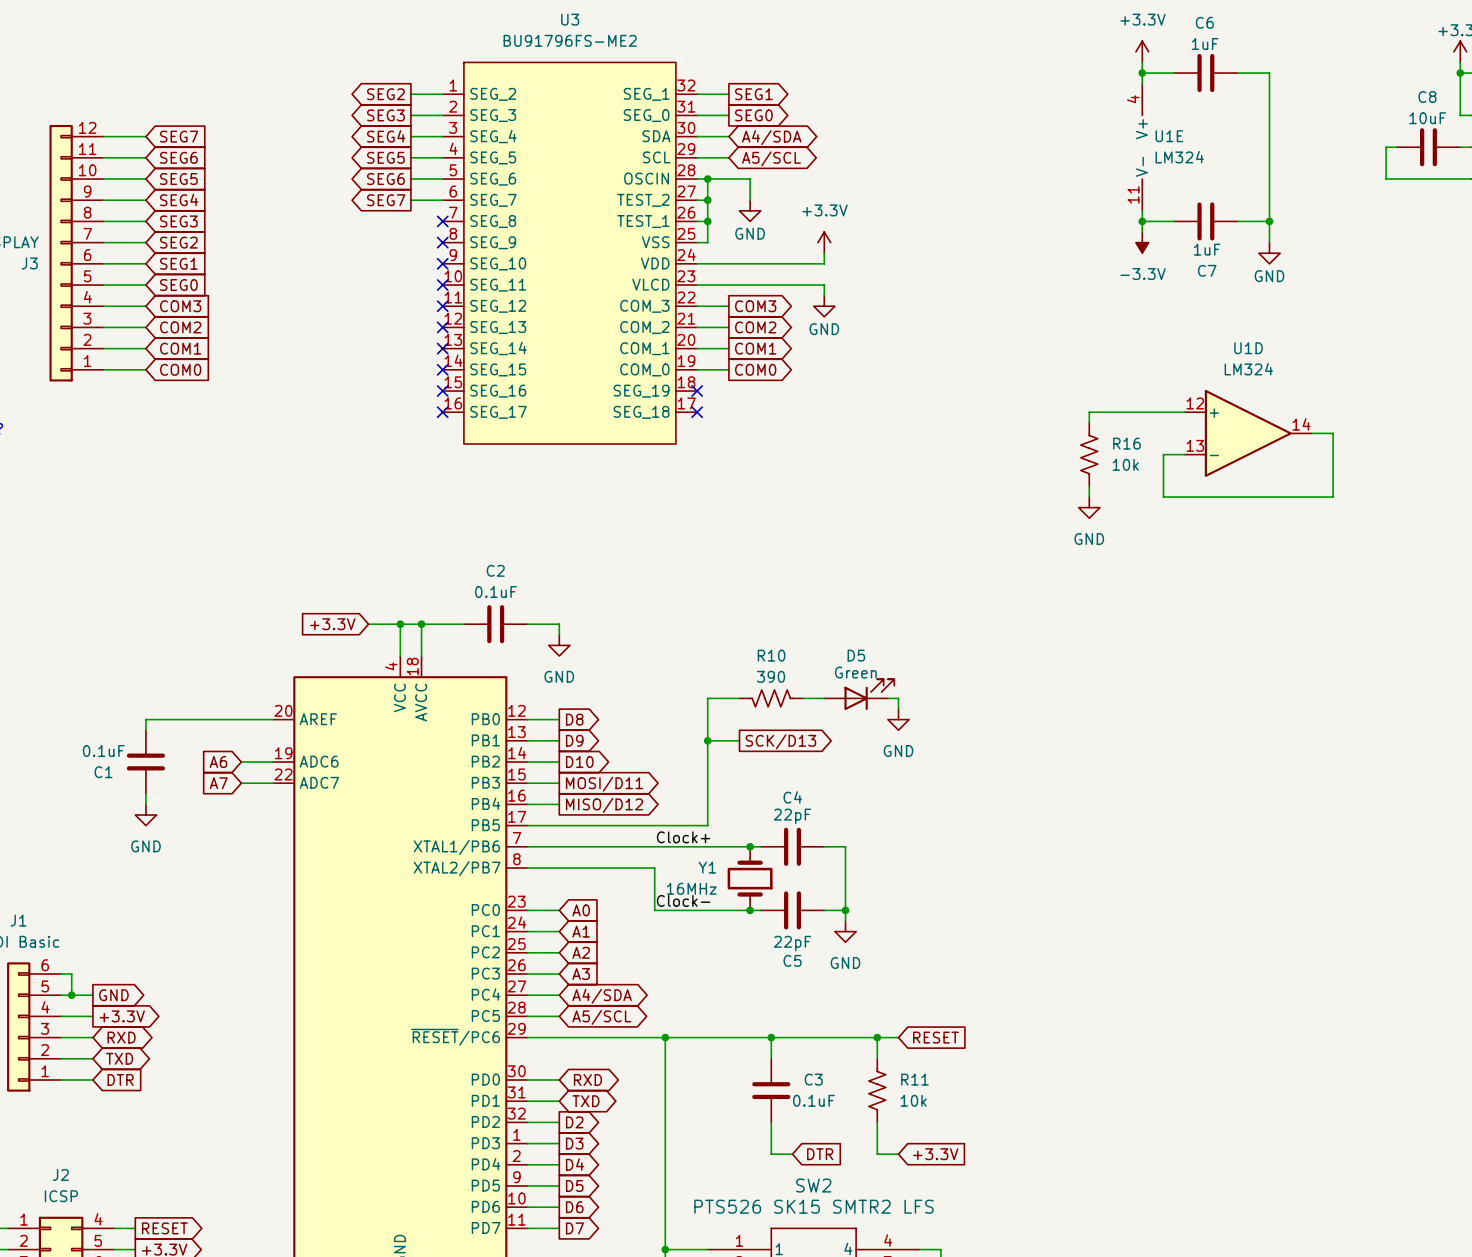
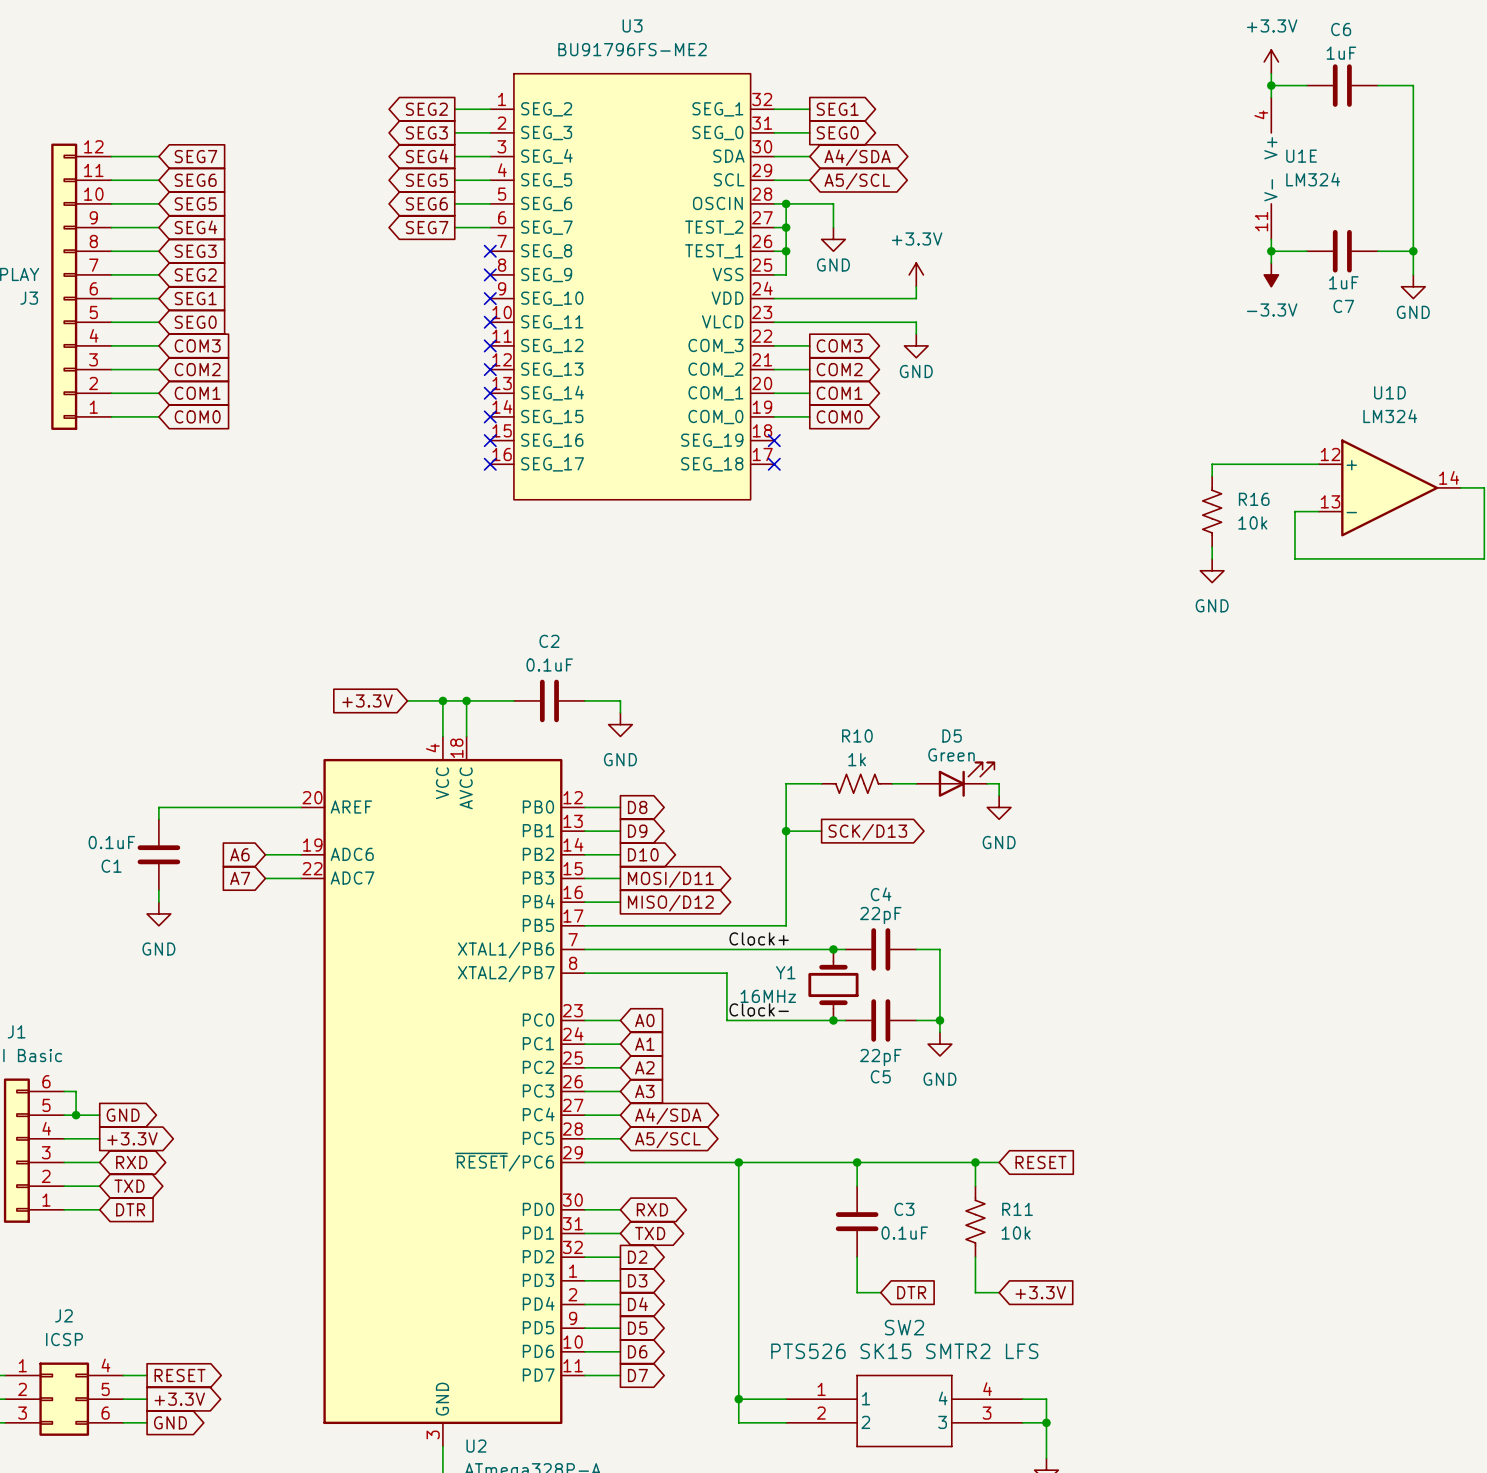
R10 value: 390 (771, 676) -> 1k (857, 759)

